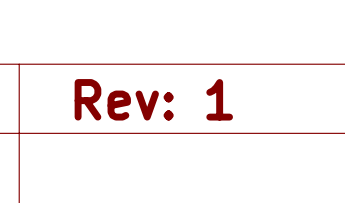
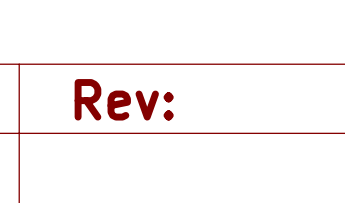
title block: Rev: 1 (153, 99) -> Rev: (124, 99)

